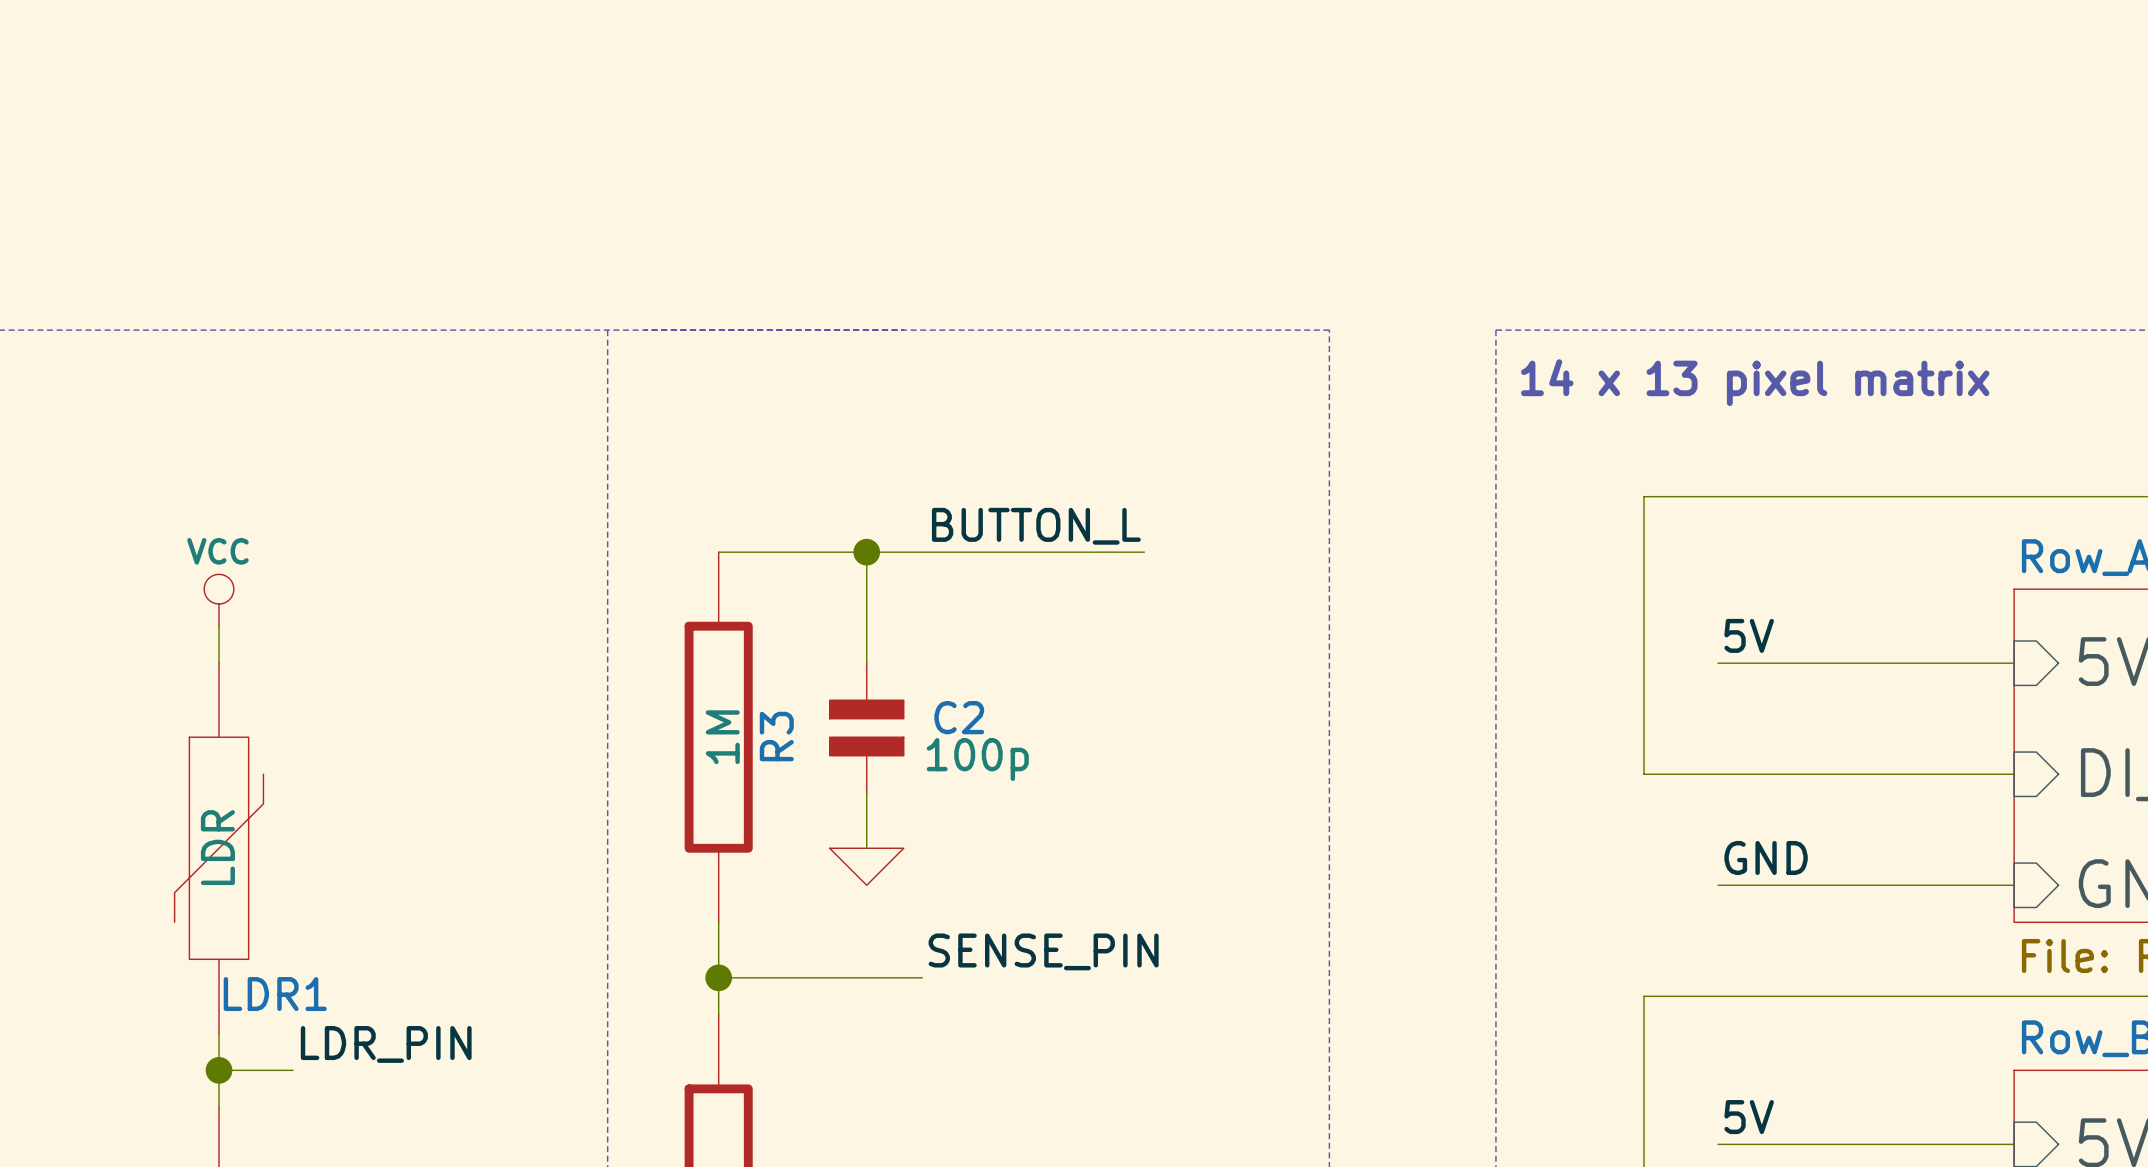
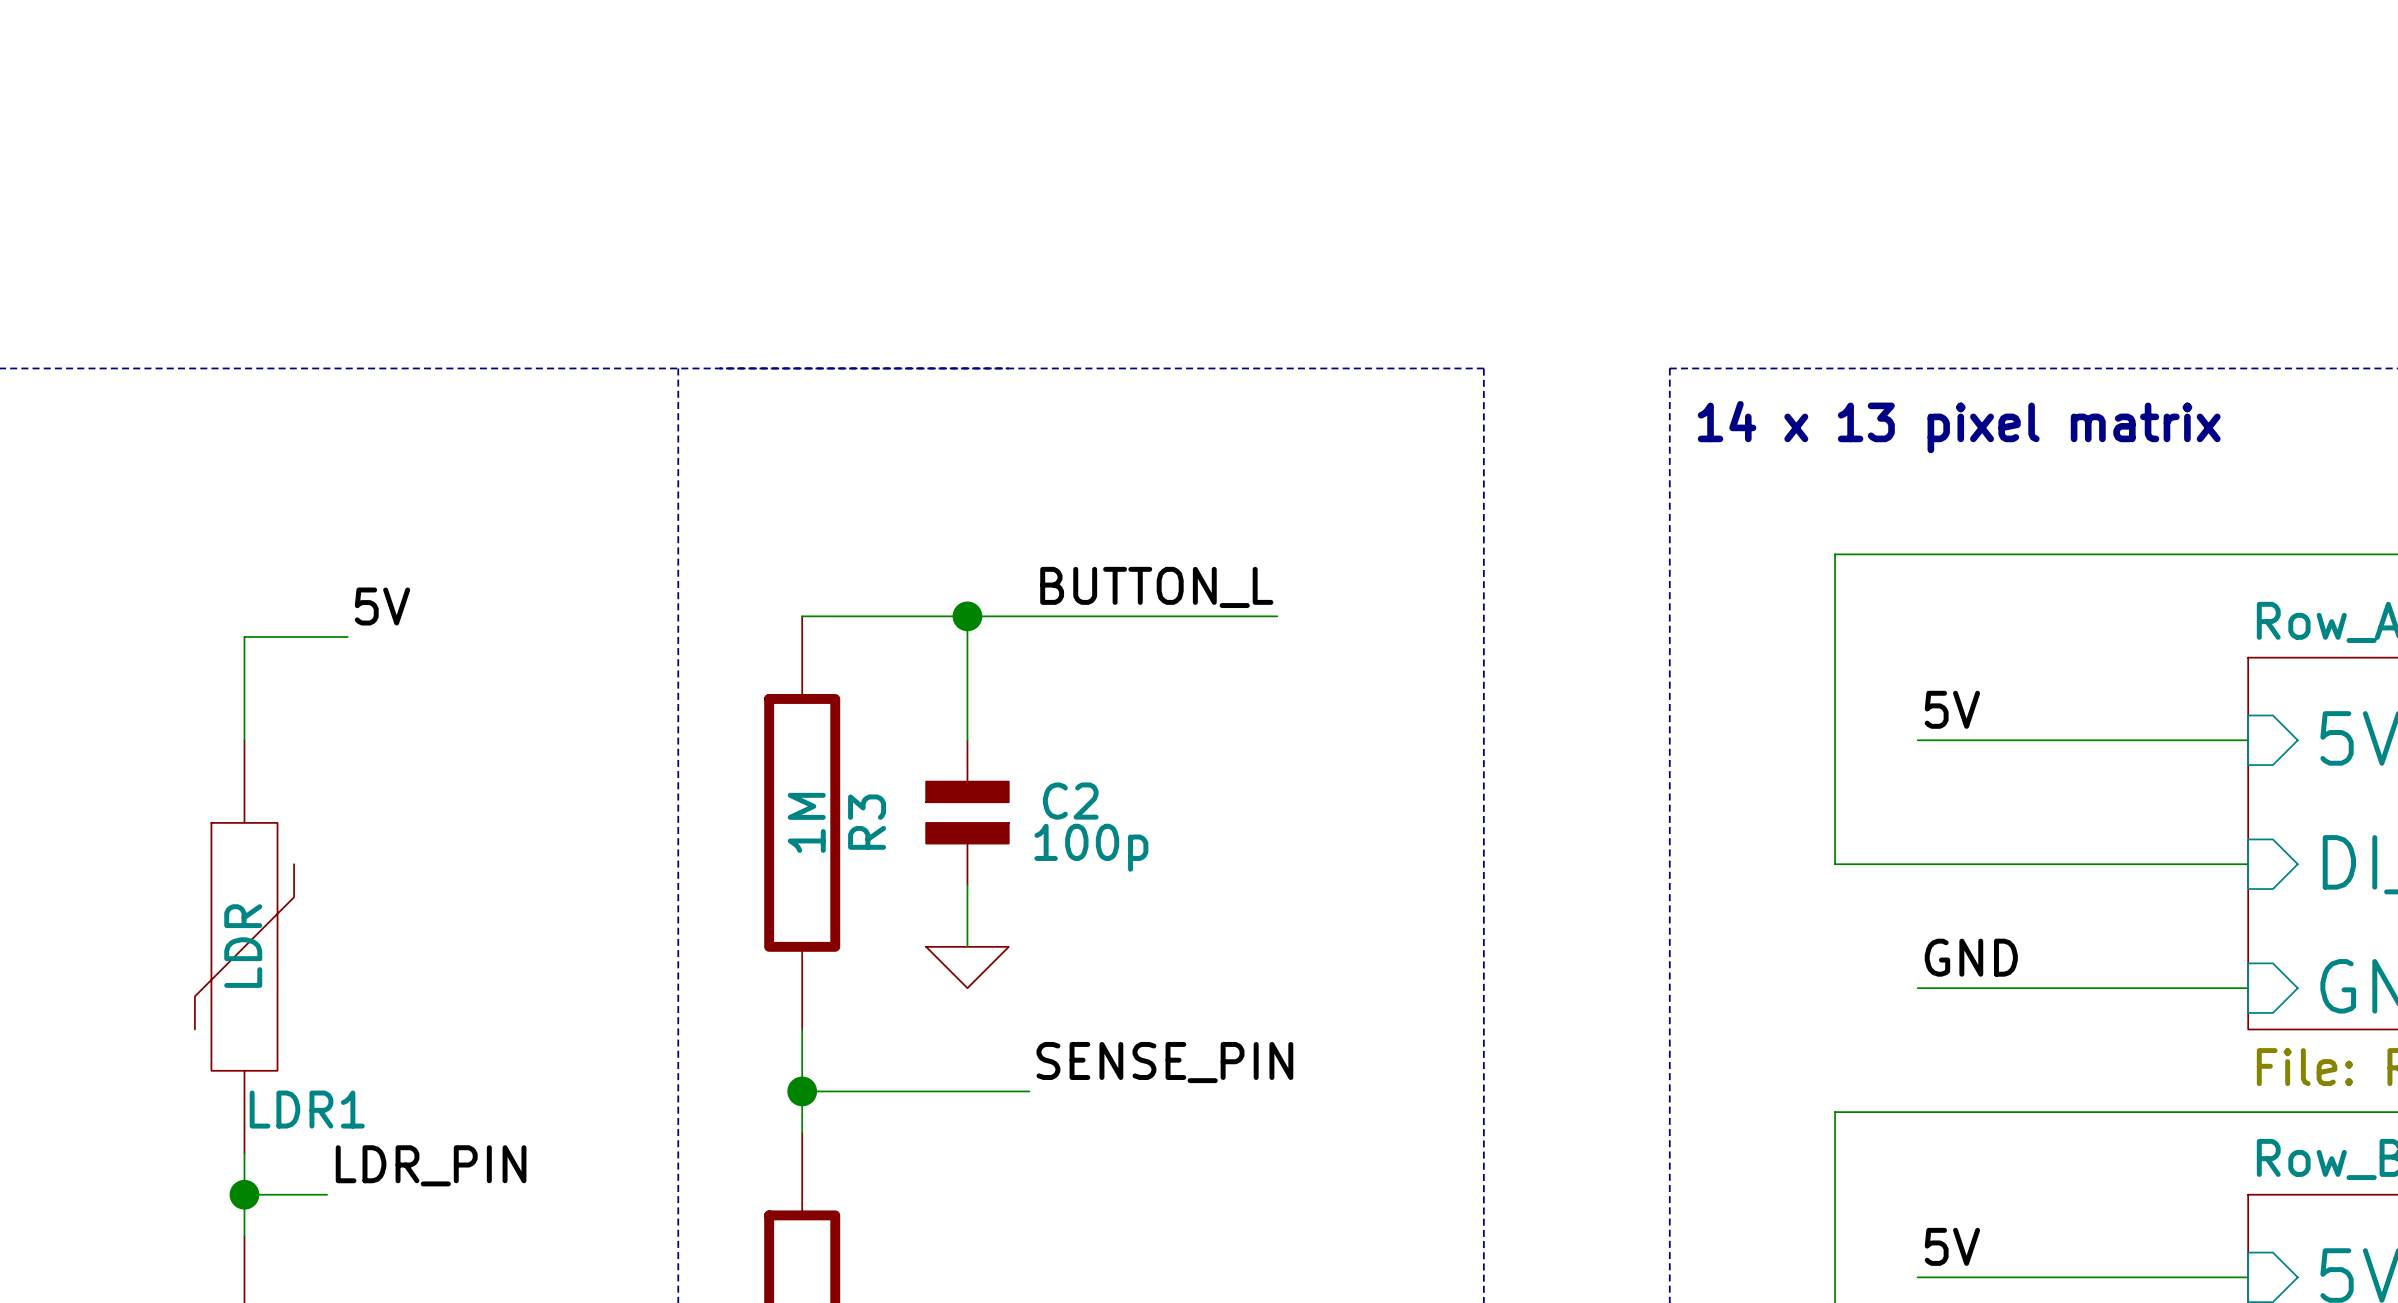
label: none -> 5V (382, 606)
wire: none -> (347, 637) (244, 637) (244, 698)
power symbol: VCC (219, 600) -> none

